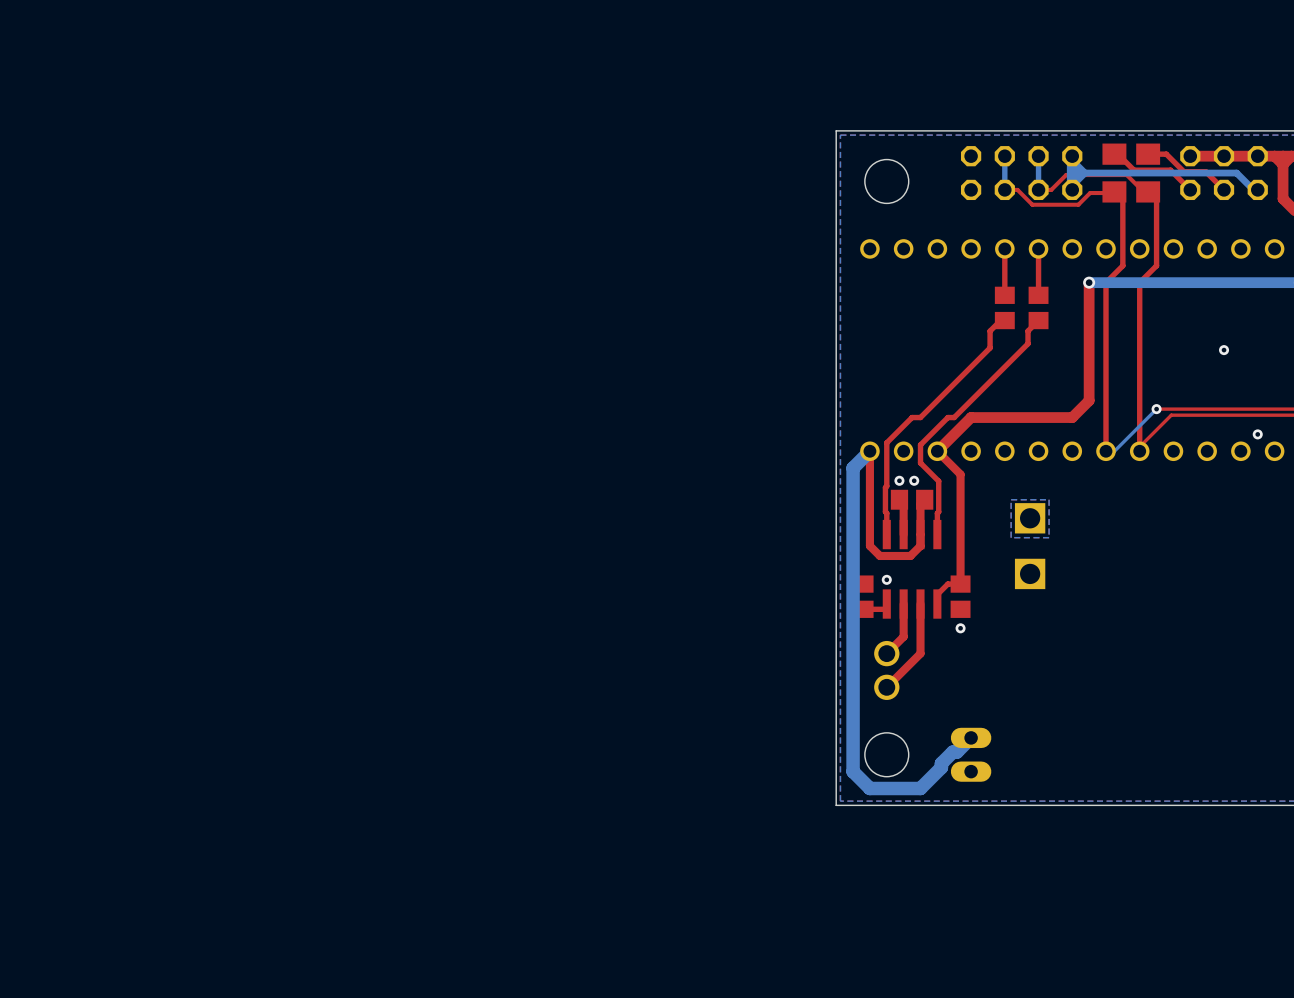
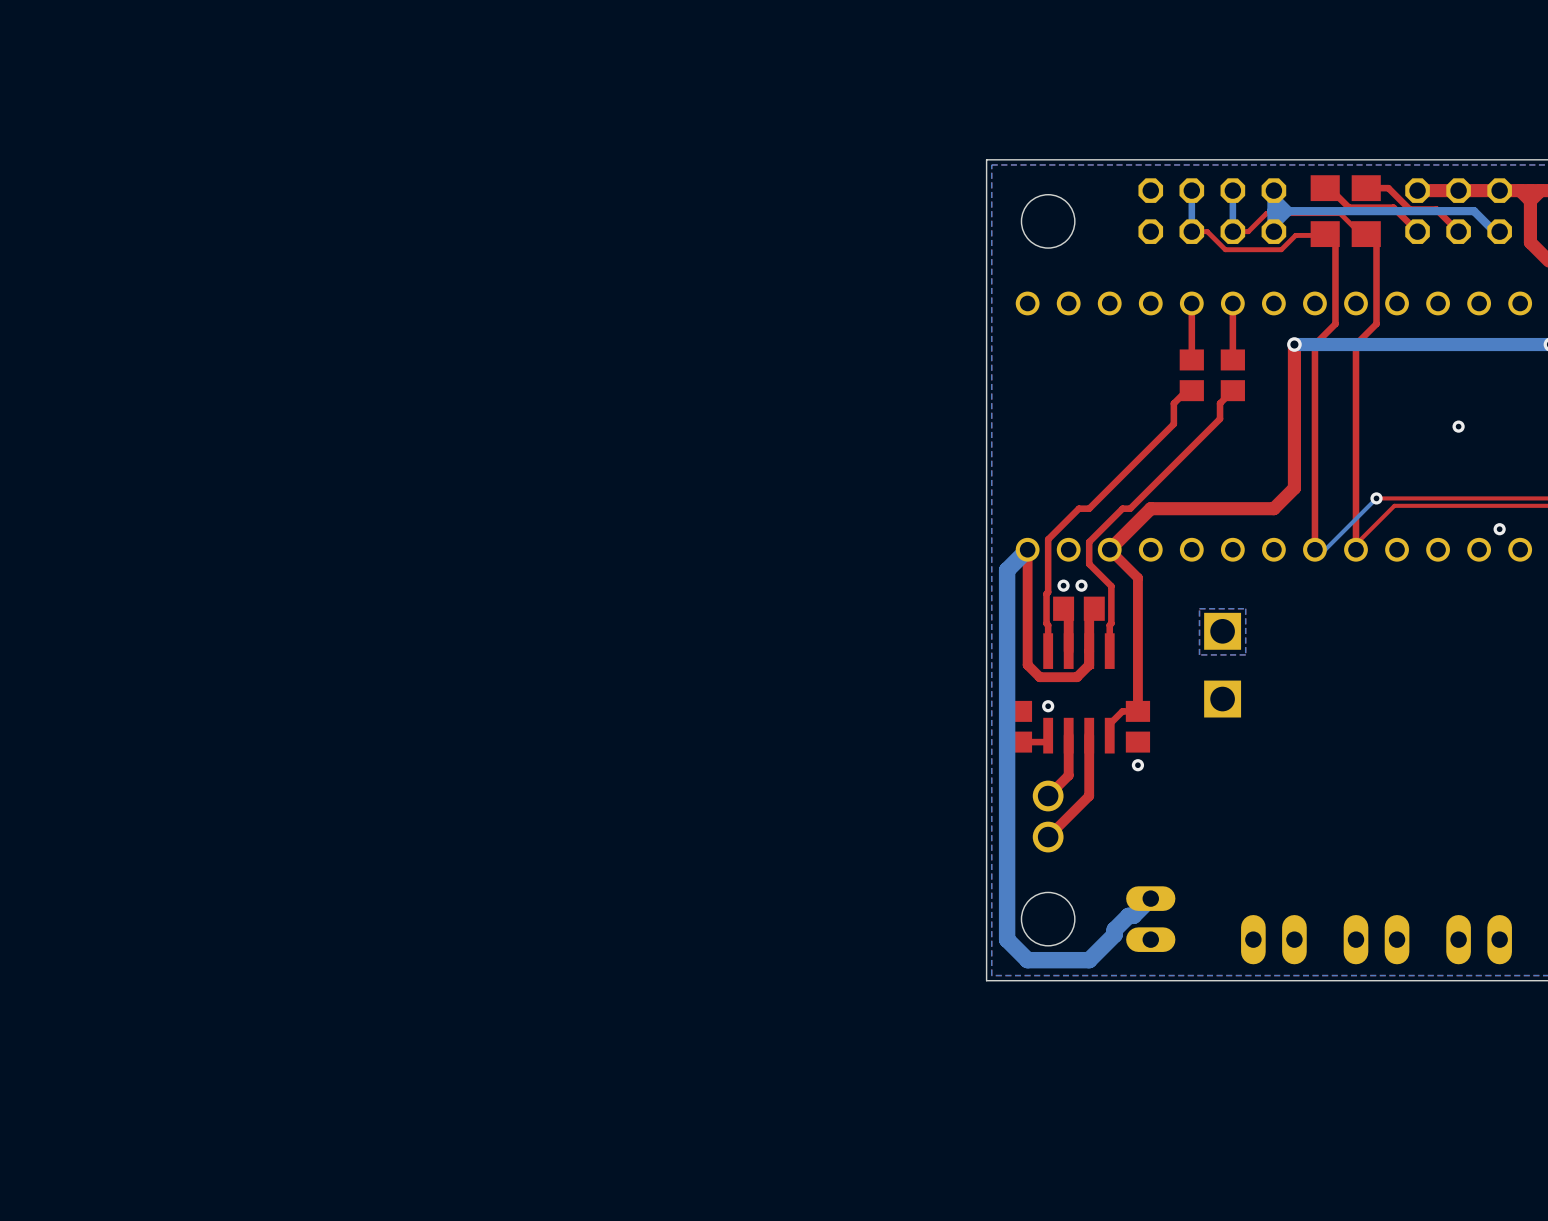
part: none -> (1273, 939)
part: none -> (1376, 939)
part: none -> (1479, 939)

